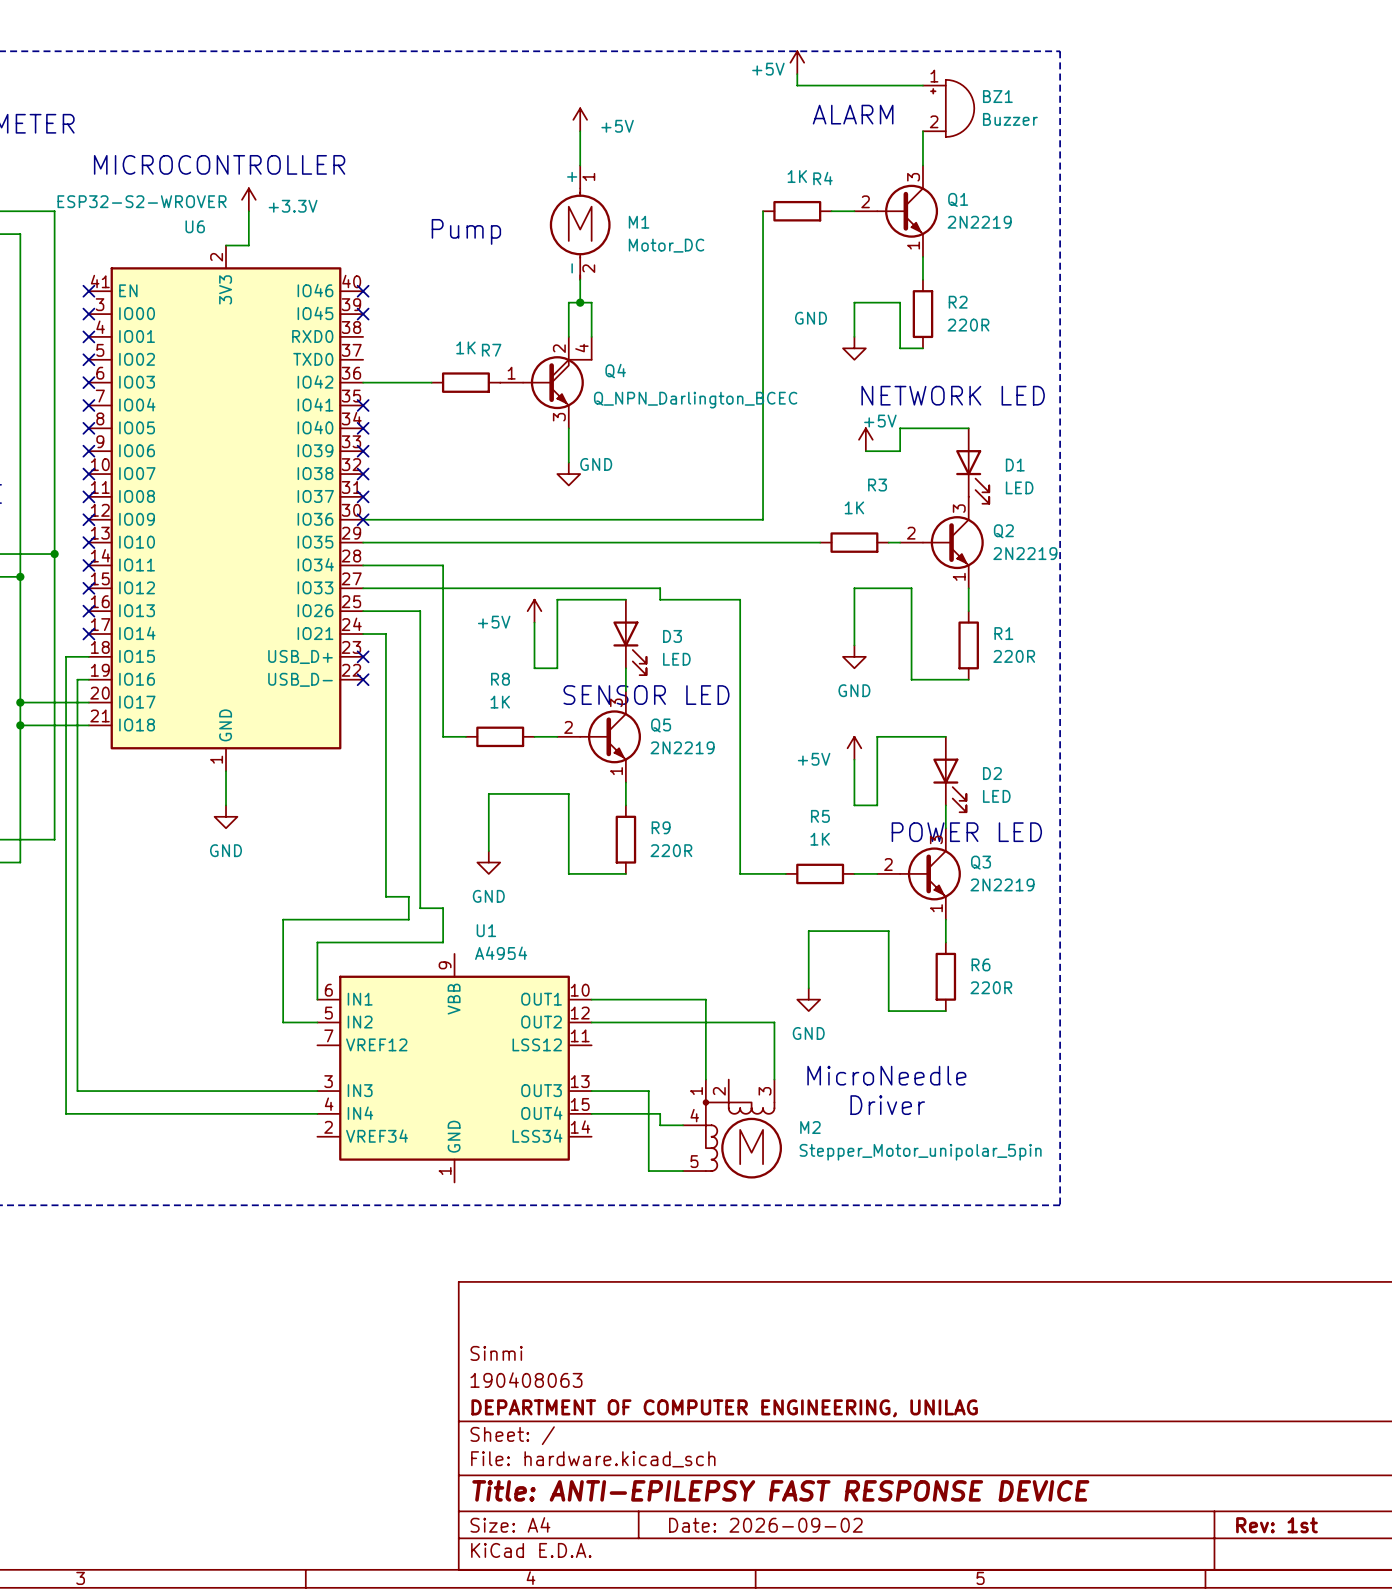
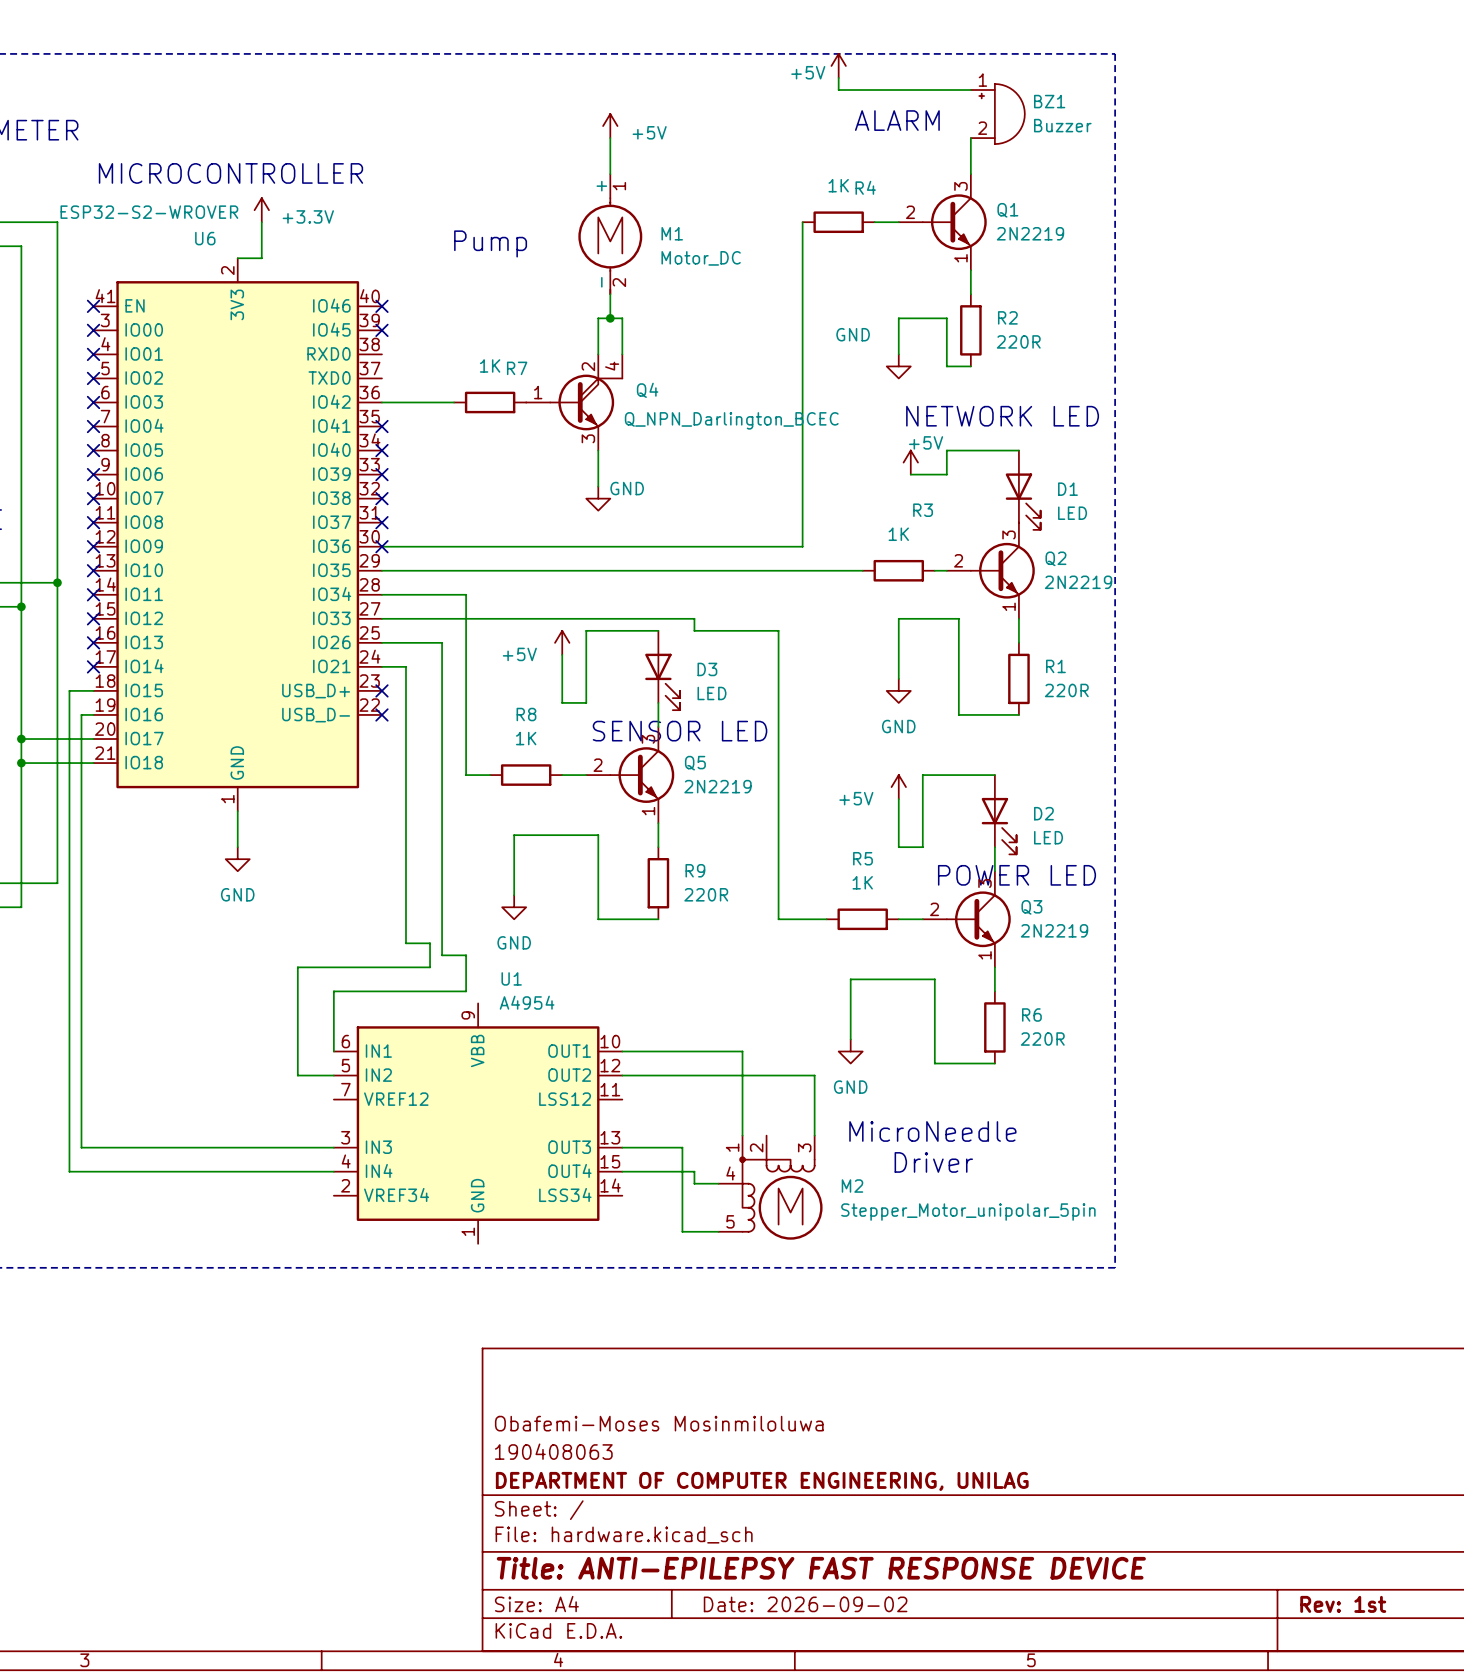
title block: Sinmi (496, 1353) -> Obafemi-Moses Mosinmiloluwa (659, 1423)

